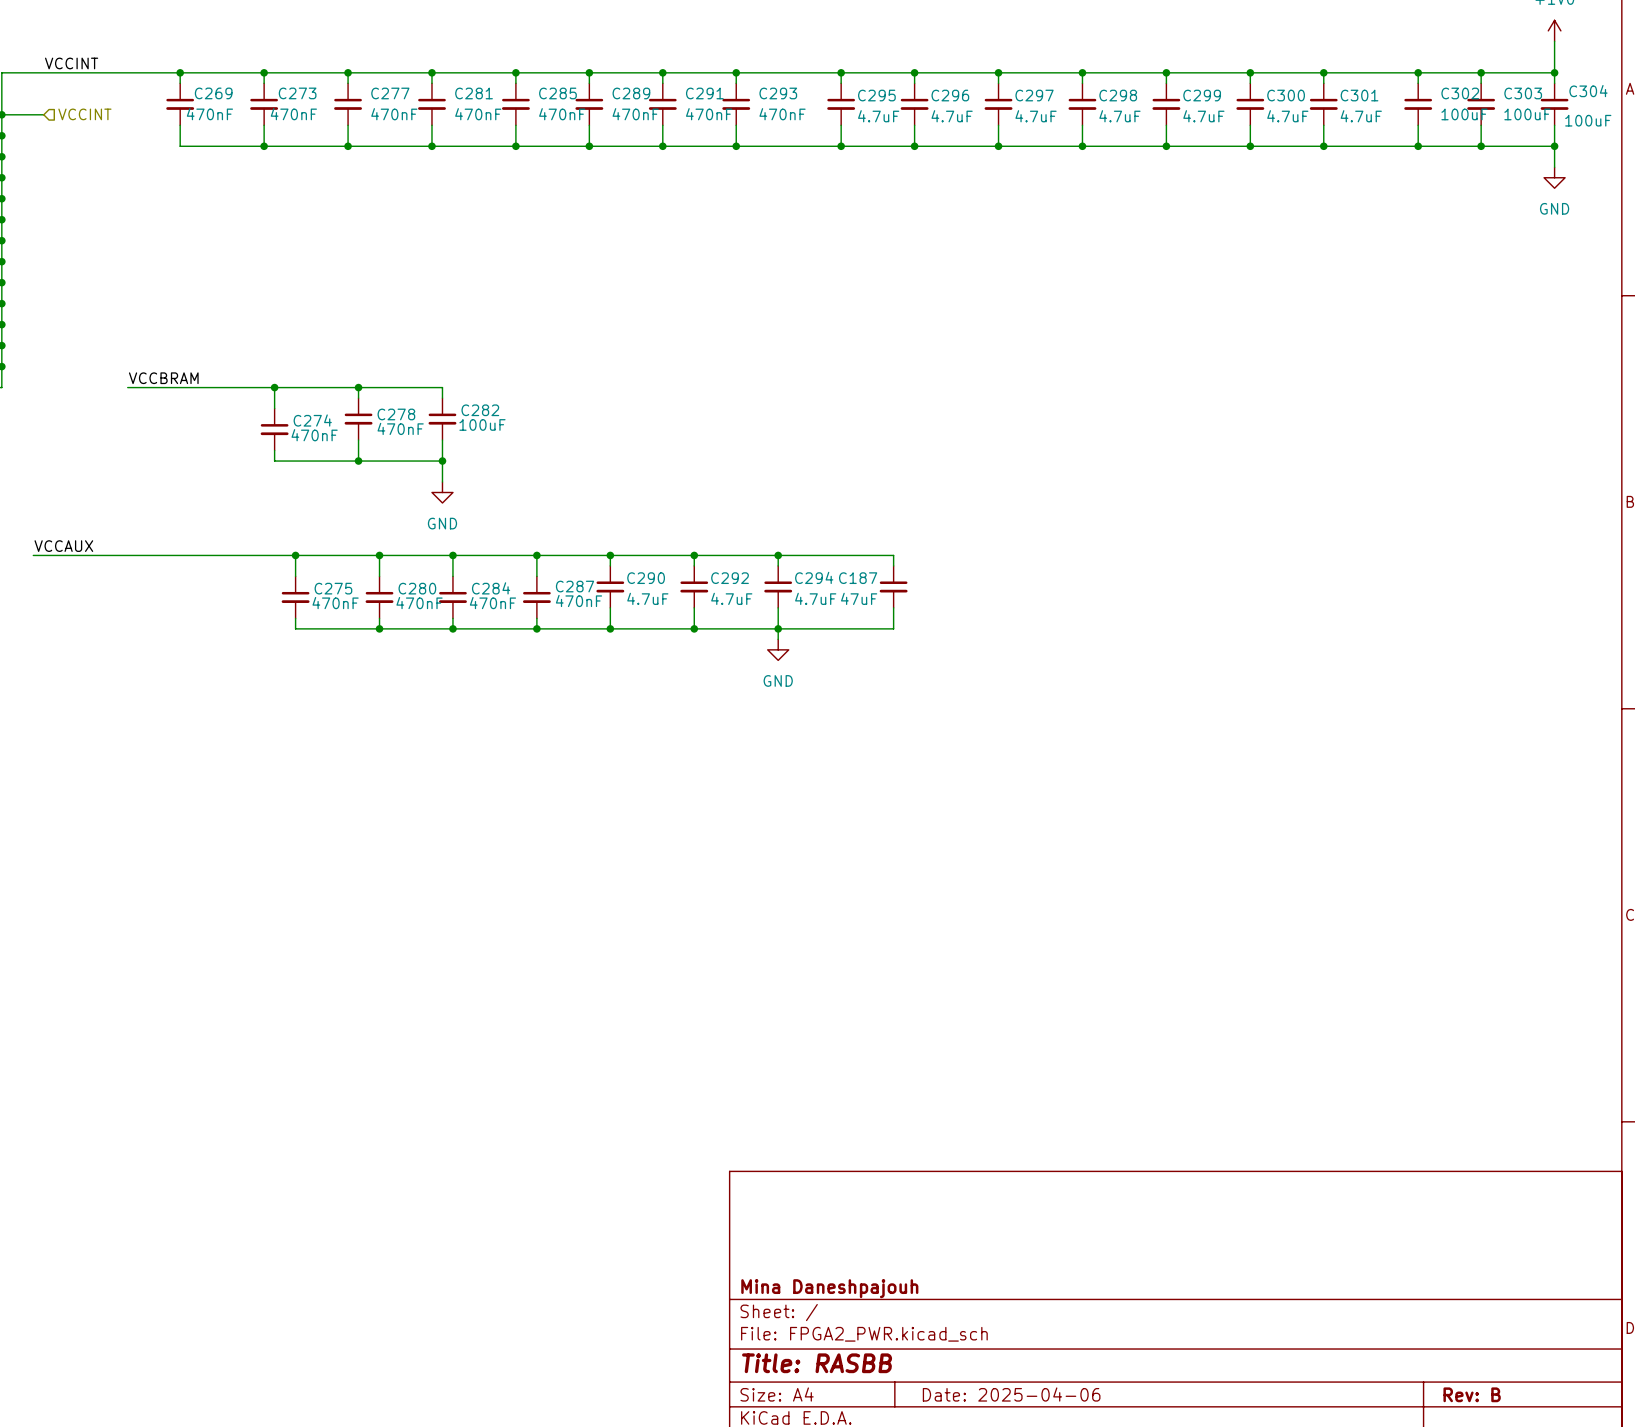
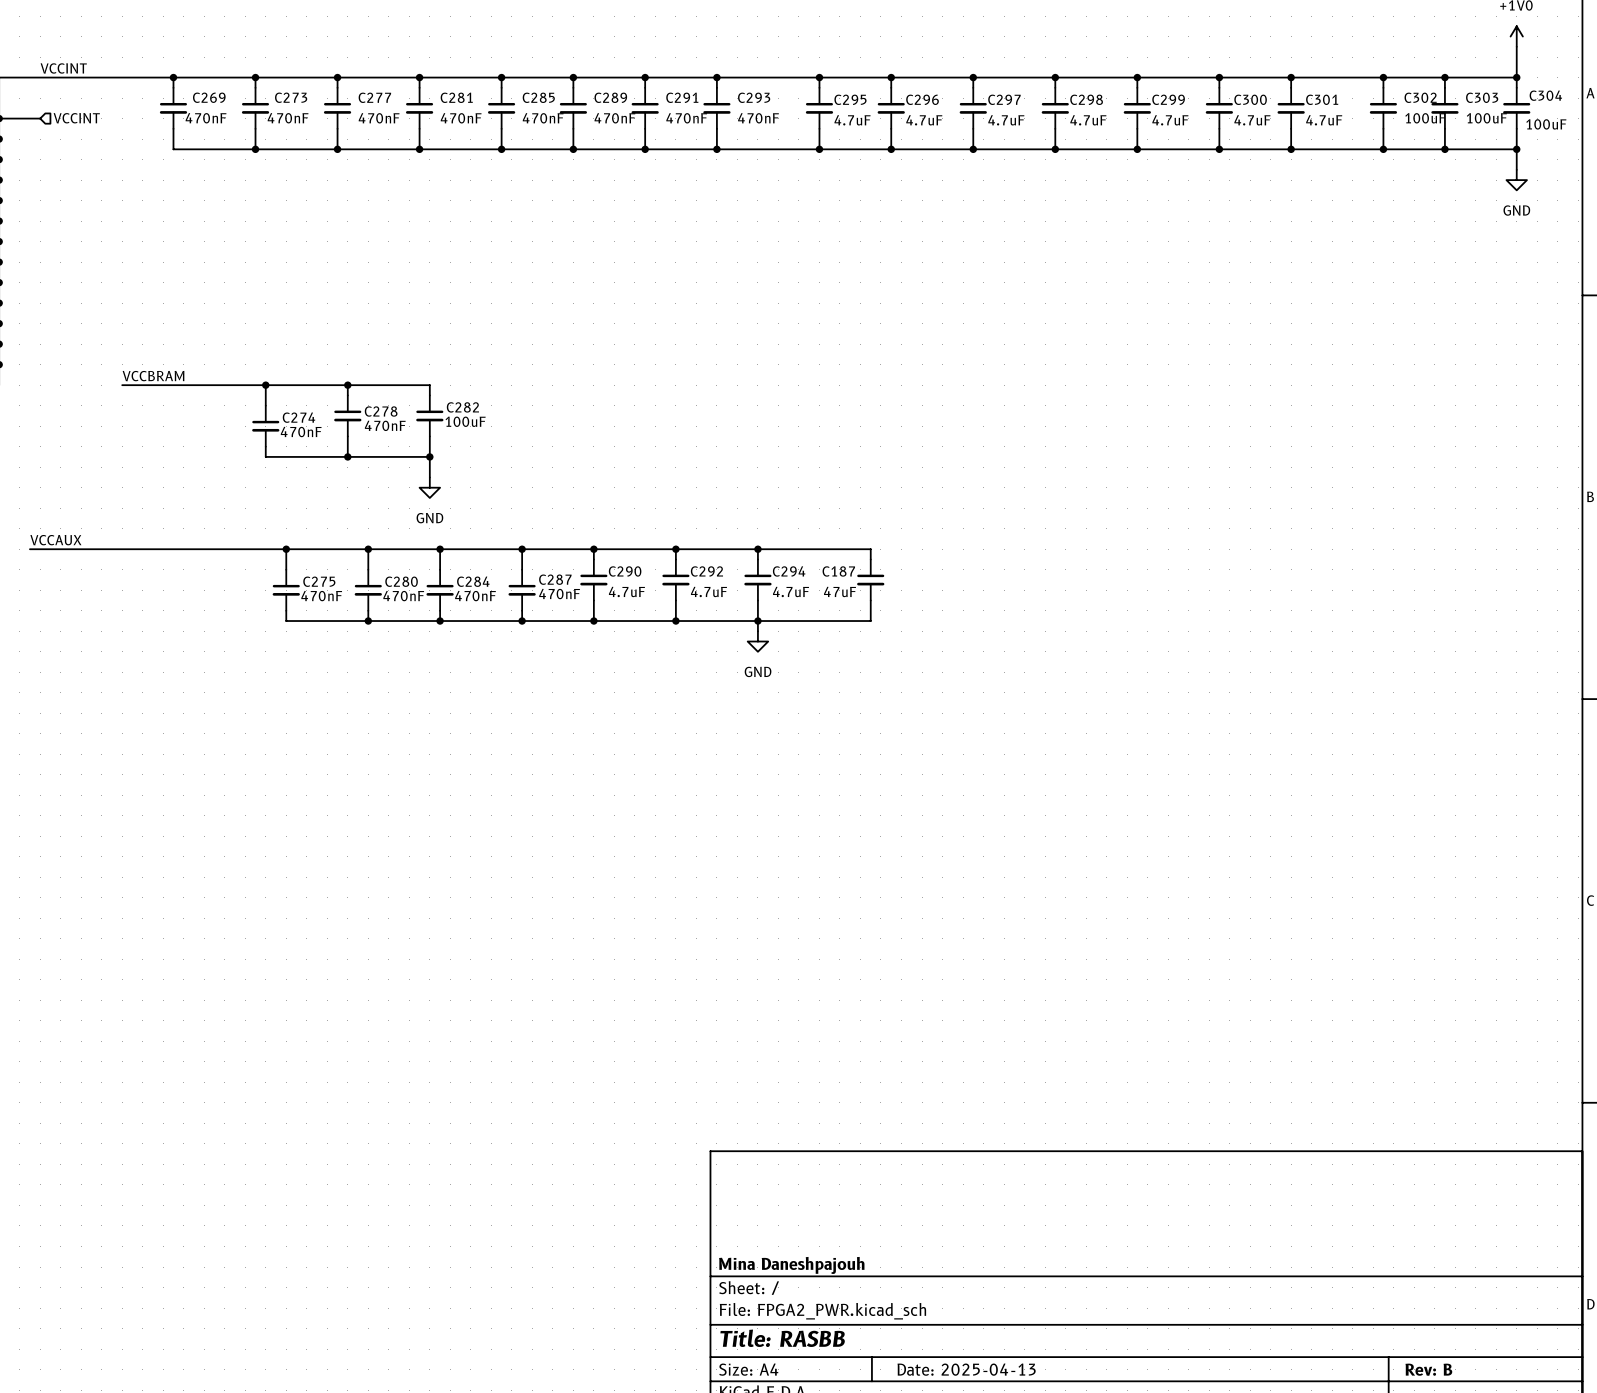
title block: Date: 2025-04-06 (1011, 1394) -> Date: 2025-04-13 (966, 1369)

